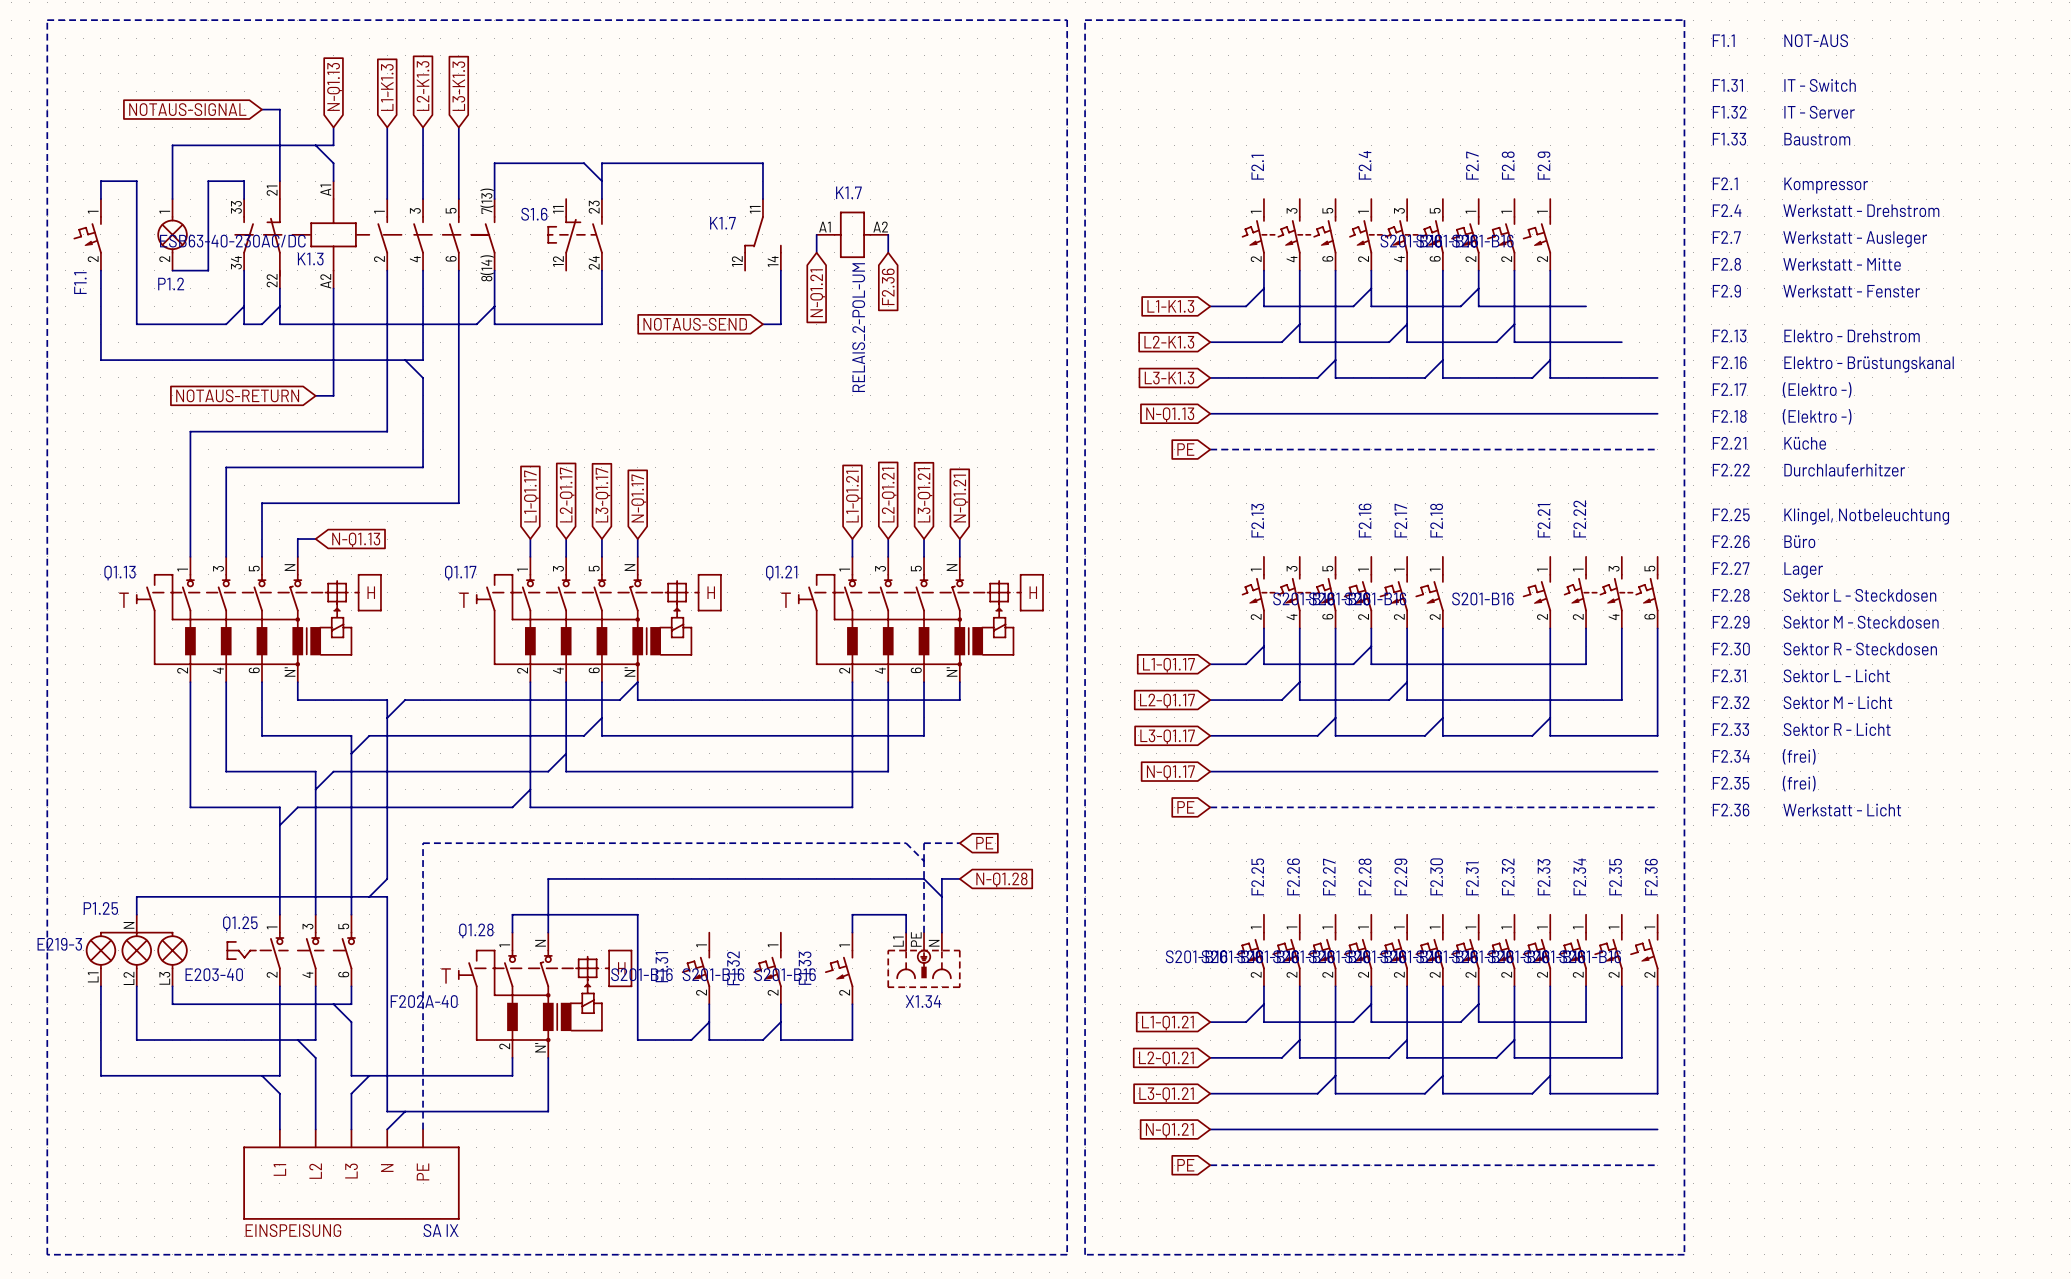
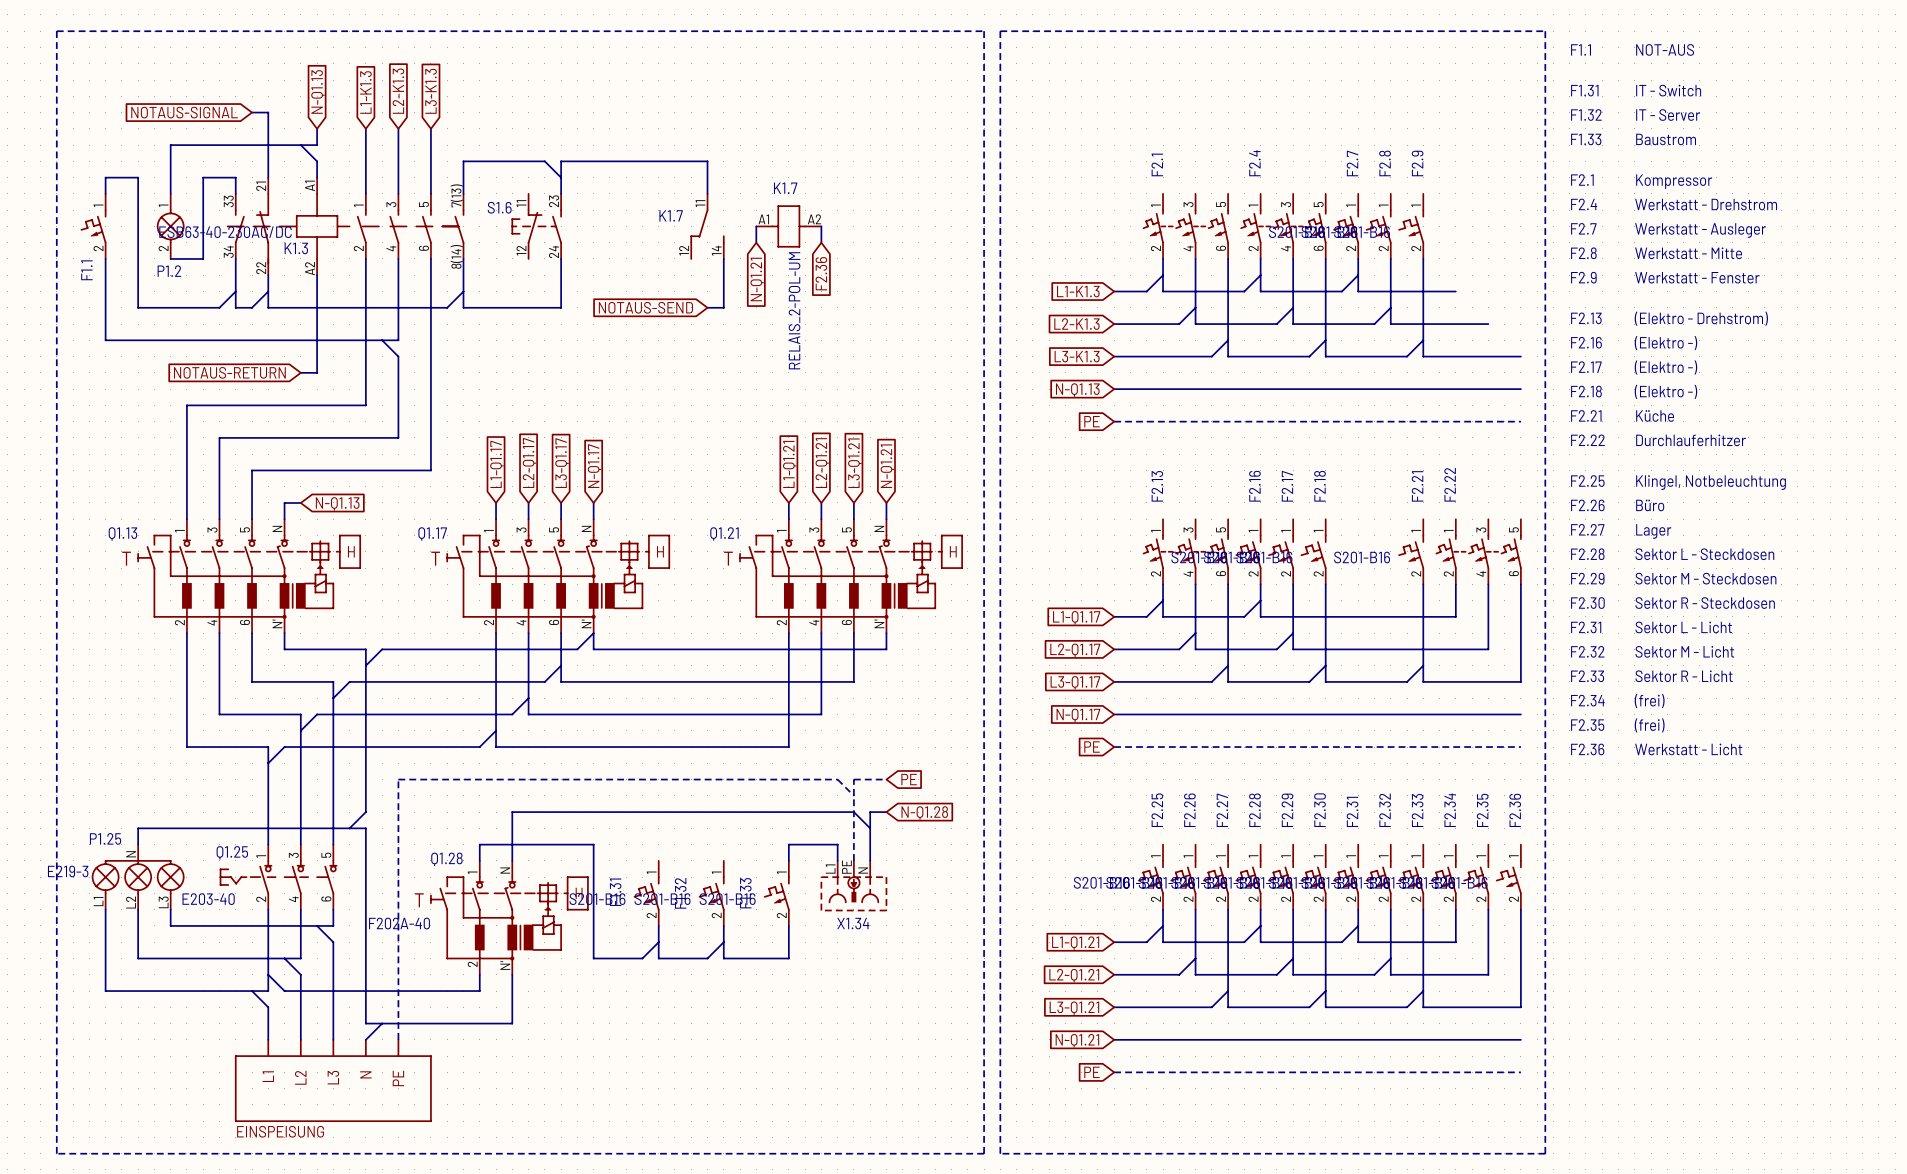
text: Elektro - Drehstrom (1852, 336) -> (Elektro - Drehstrom) (1701, 318)
text: Elektro - Brüstungskanal (1869, 364) -> (Elektro -) (1665, 343)
wire: (369, 1075) (351, 1093) -> (268, 974) (284, 991) (333, 991) (333, 1007)
text: SA IX (440, 1230) -> none

